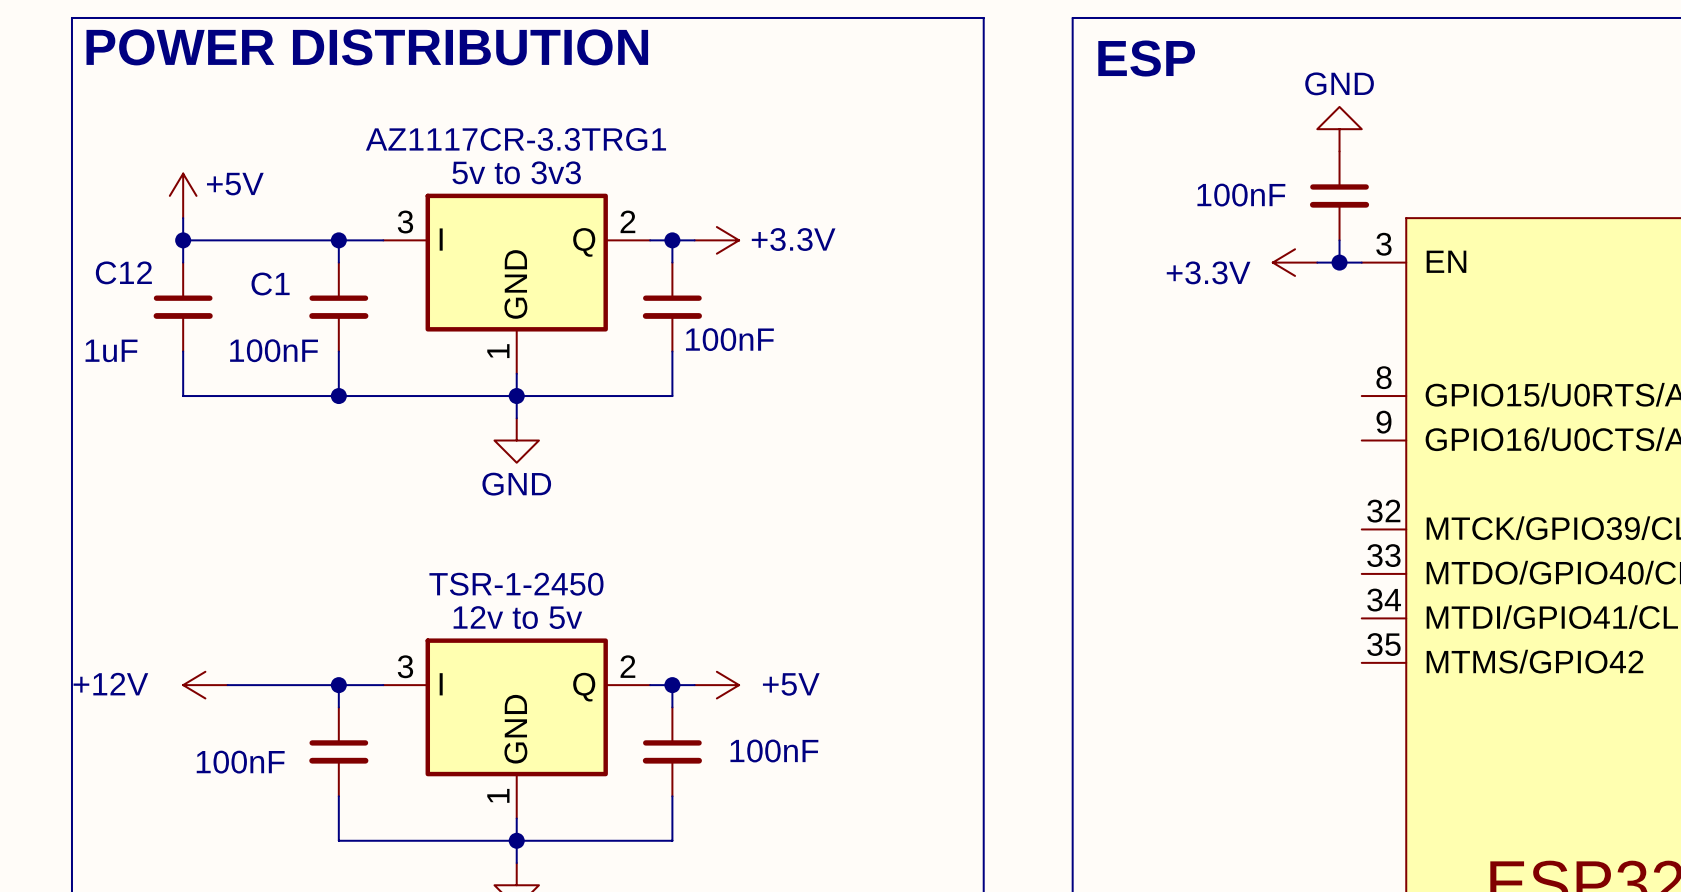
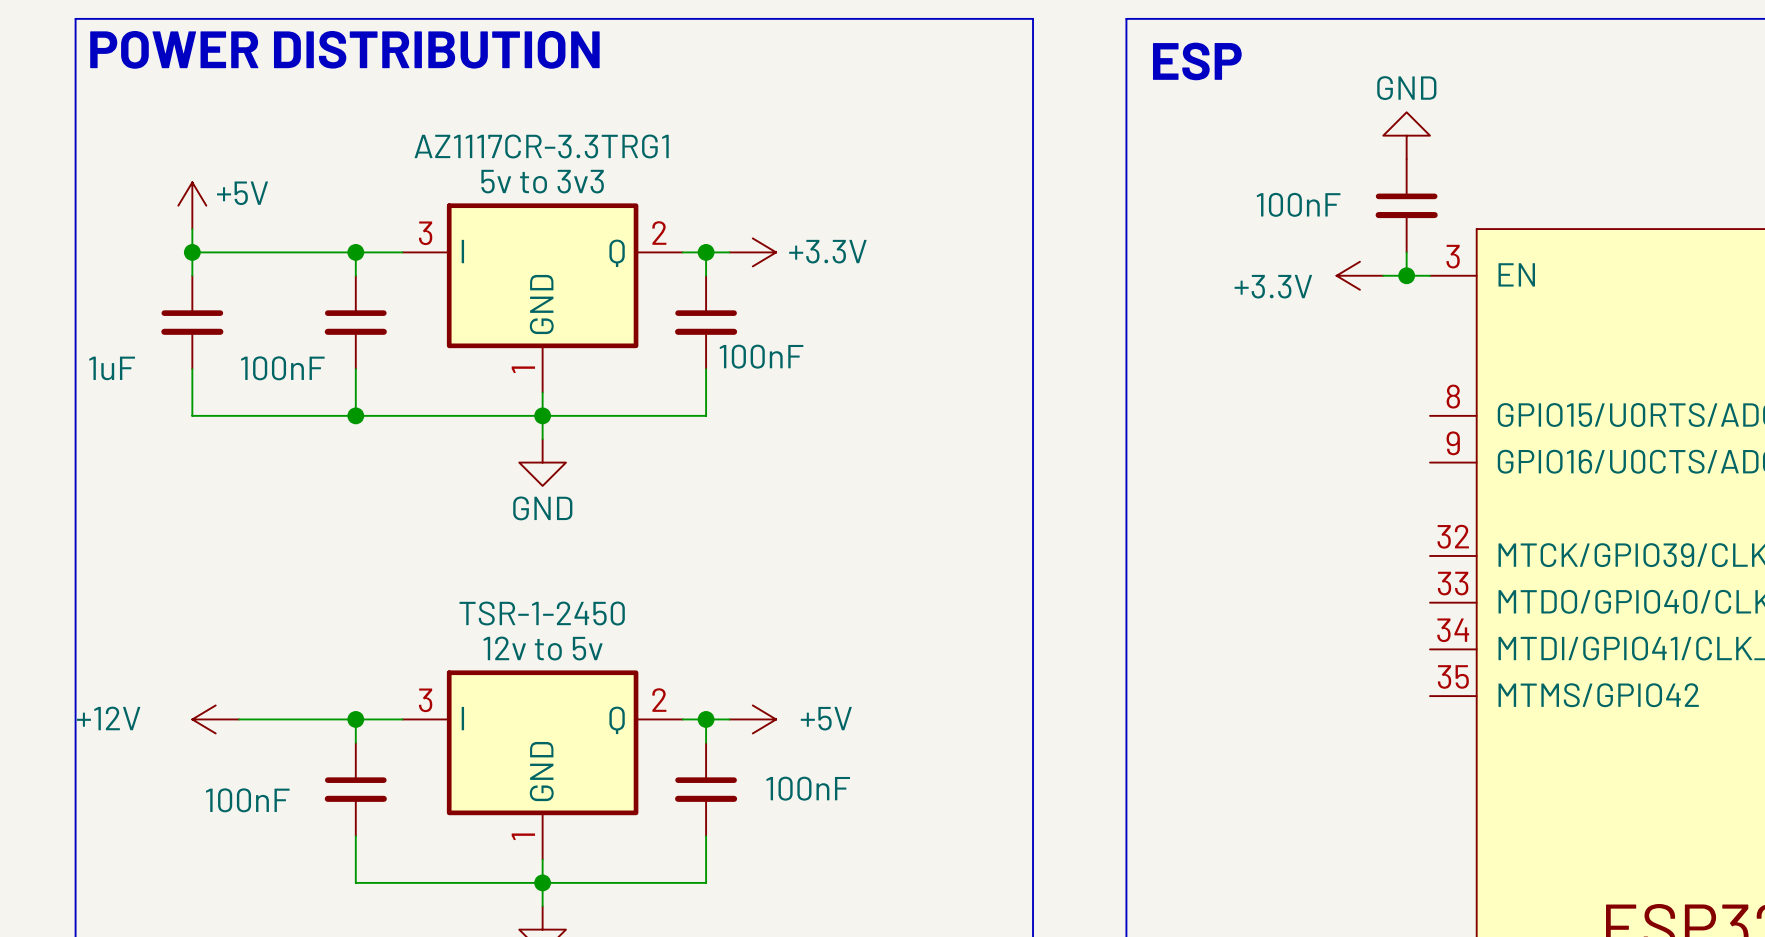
C12 name: C12 (123, 272) -> none
C1 name: C1 (270, 284) -> none

